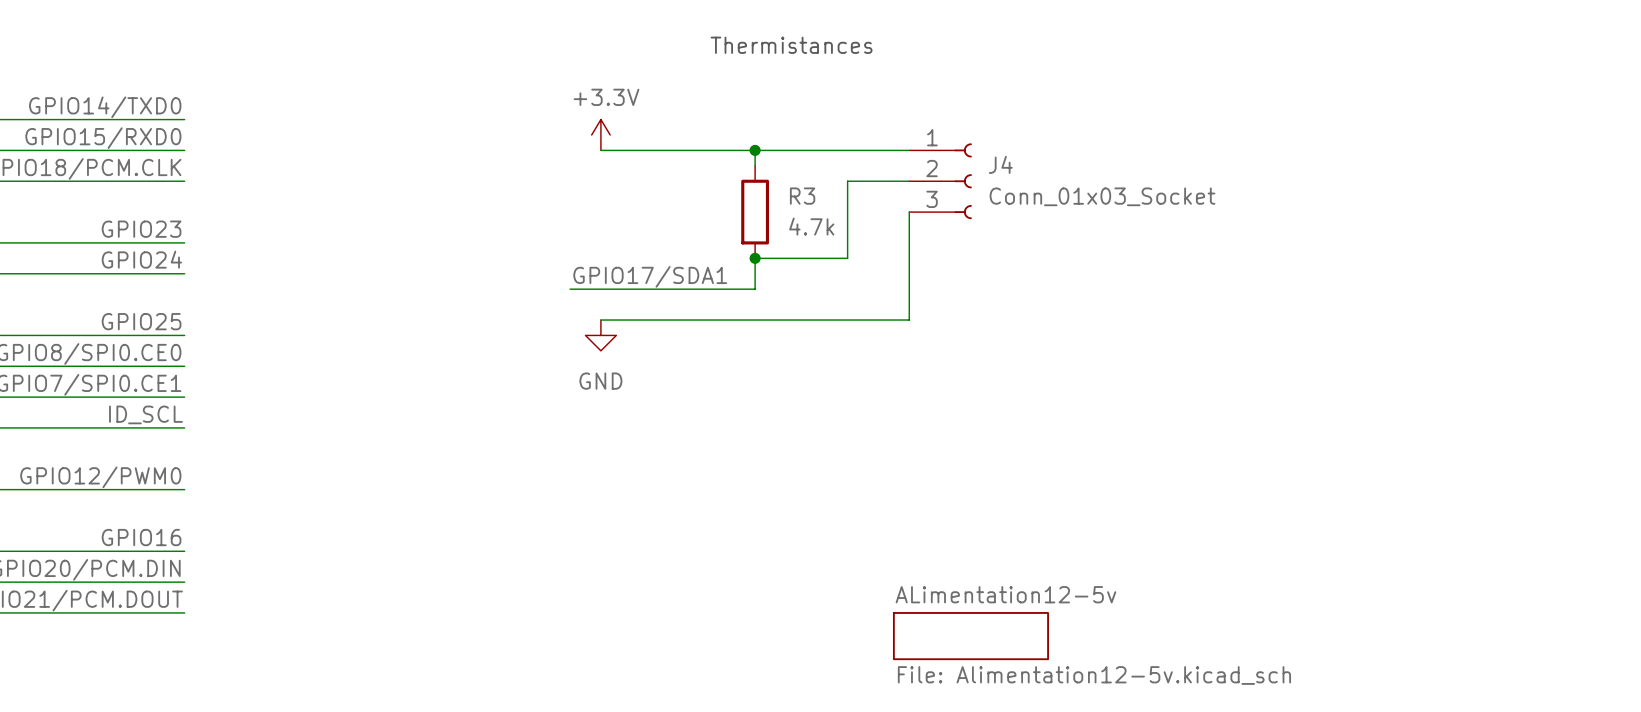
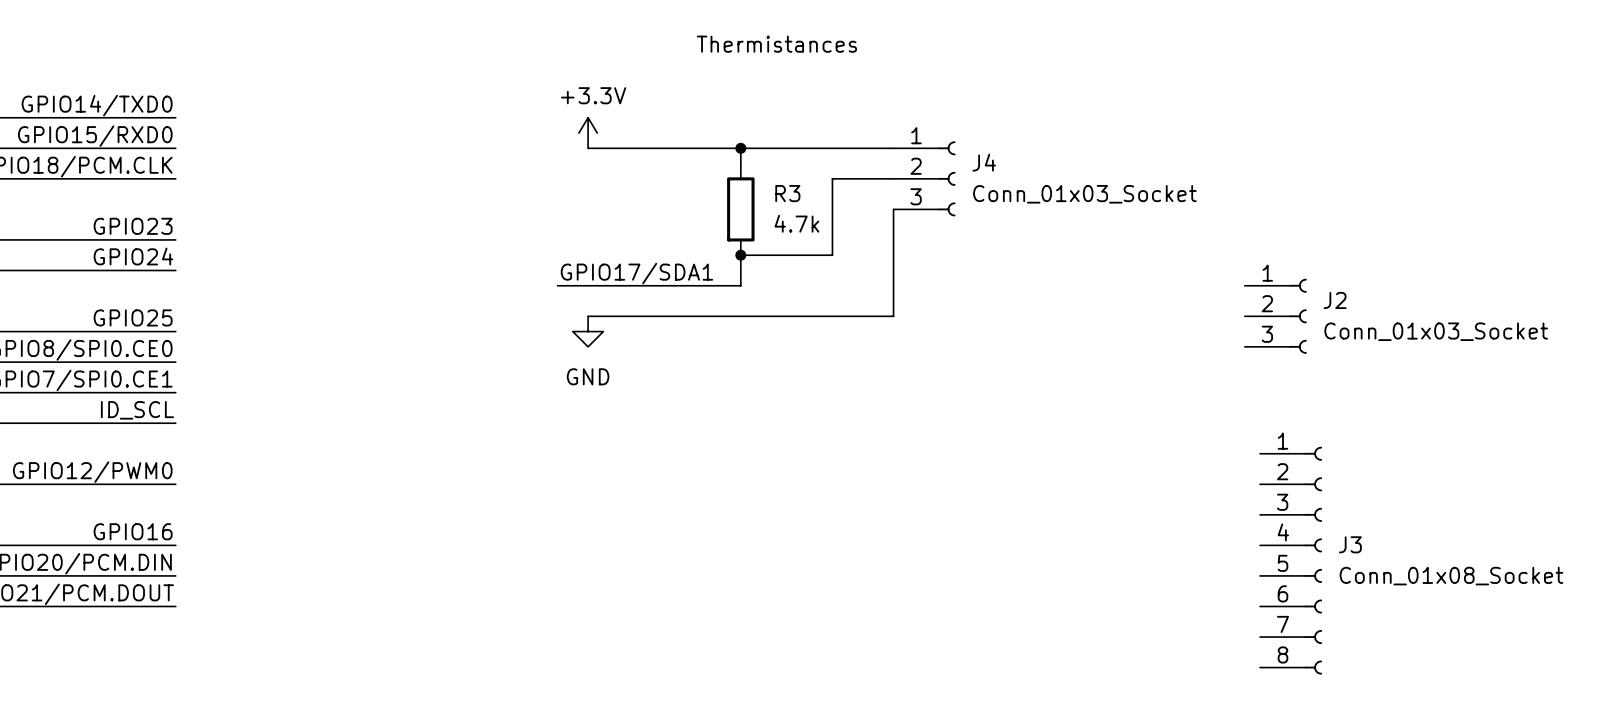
J2: none -> Conn_01x03_Socket (1275, 316)
J3: none -> Conn_01x08_Socket (1291, 560)
sheet ALimentation12-5v: File: Alimentation12-5v.kicad_sch (970, 636) -> none

